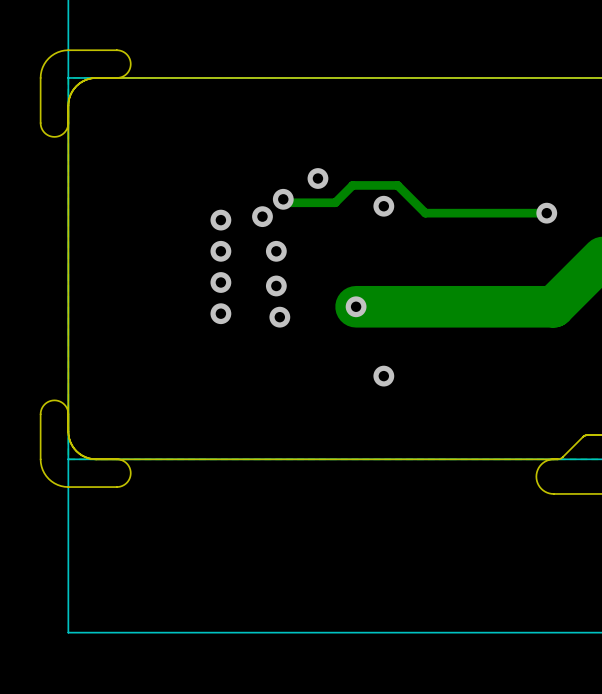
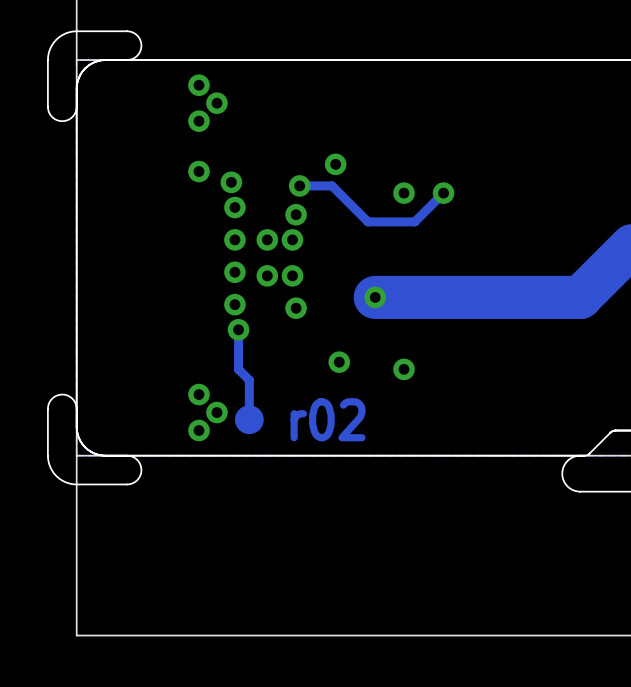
via: none -> (198, 85)
via: none -> (216, 103)
via: none -> (198, 121)
via: none -> (198, 171)
via: none -> (231, 182)
track: (283, 199) (286, 202) (335, 202) (352, 185) (397, 185) (425, 213) (546, 213) -> none
track: none -> (303, 185) (332, 185) (368, 221) (414, 221) (443, 193)
via: none -> (443, 193)
via: (546, 213) -> none
via position: (262, 216) -> (296, 214)
via: none -> (267, 239)
via: none -> (267, 275)
track: none -> (238, 329) (238, 369) (249, 380) (249, 419)
via: none -> (238, 329)
via: none -> (339, 362)
via: none -> (198, 394)
via: none -> (216, 412)
part: none -> (249, 419)
text: none -> r02 (328, 419)
via: none -> (198, 430)

